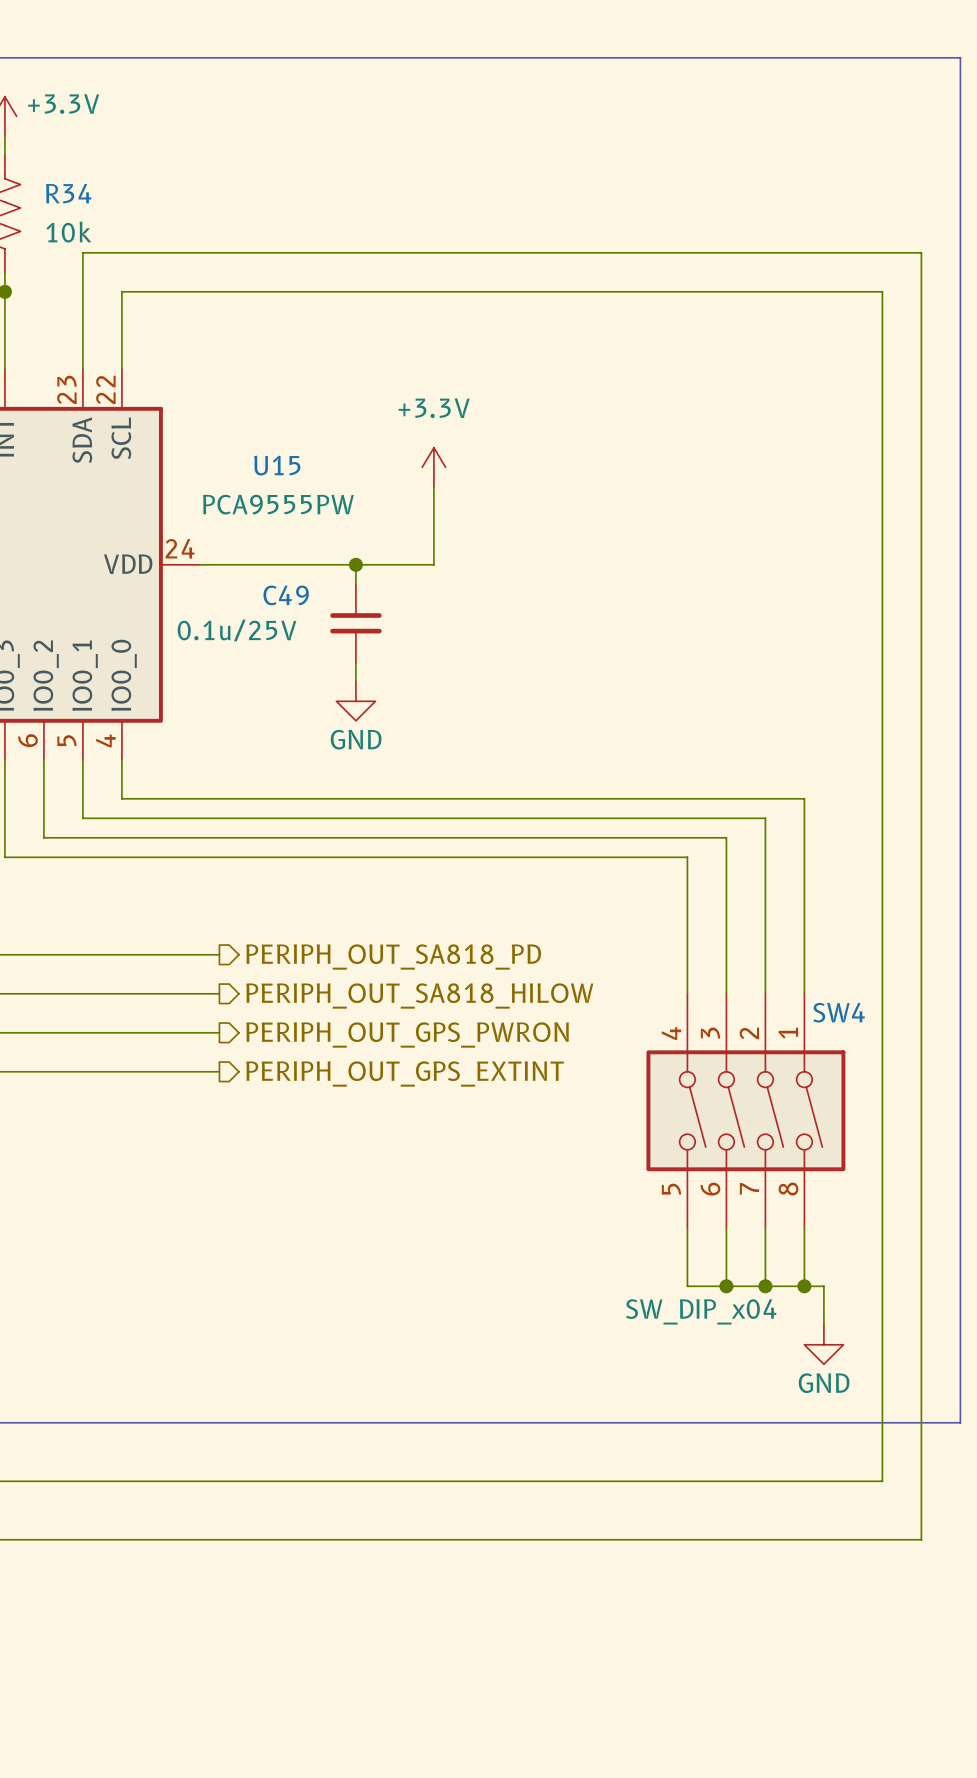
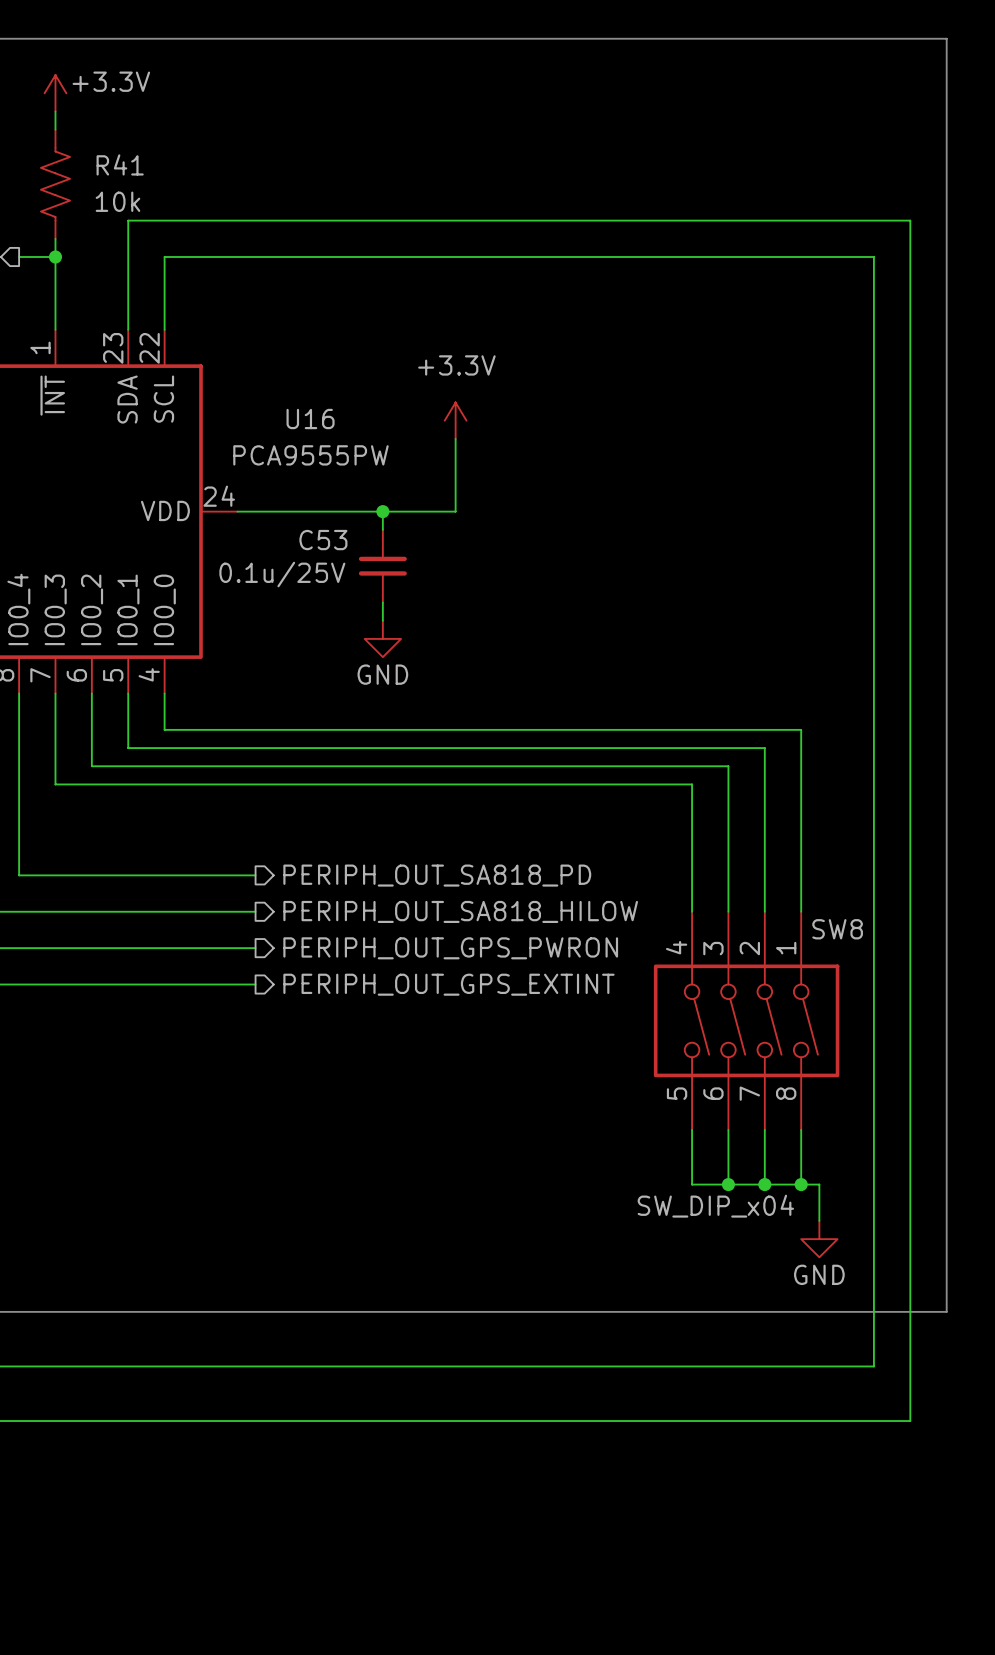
R34 name: R34 (68, 193) -> R41 (120, 164)
U15 name: U15 (277, 465) -> U16 (310, 419)
C49 name: C49 (286, 595) -> C53 (323, 540)
SW4 name: SW4 (839, 1012) -> SW8 (837, 929)

